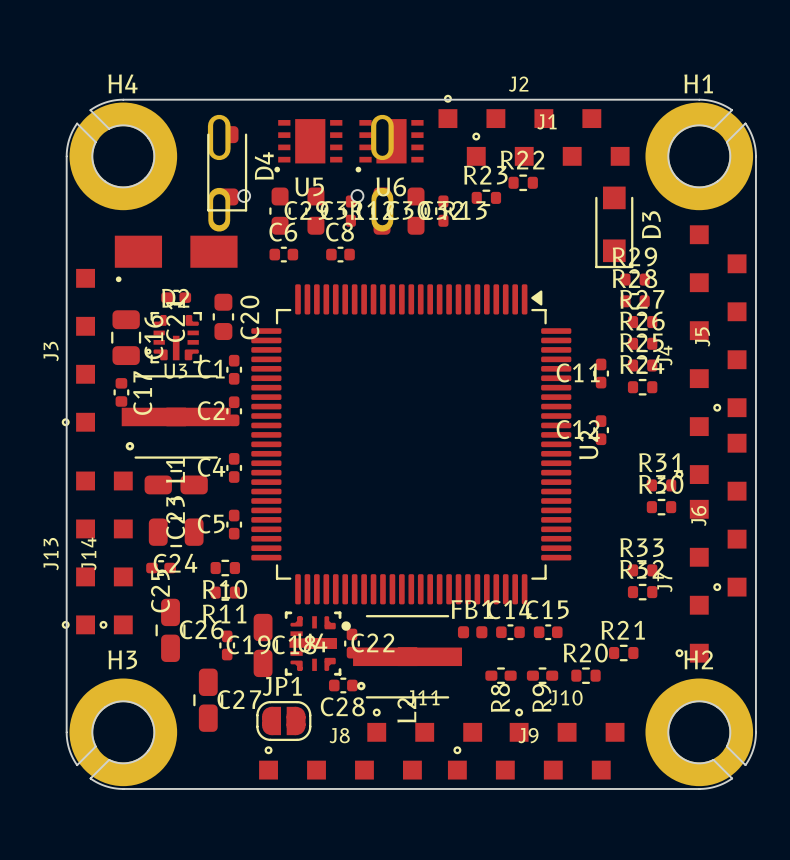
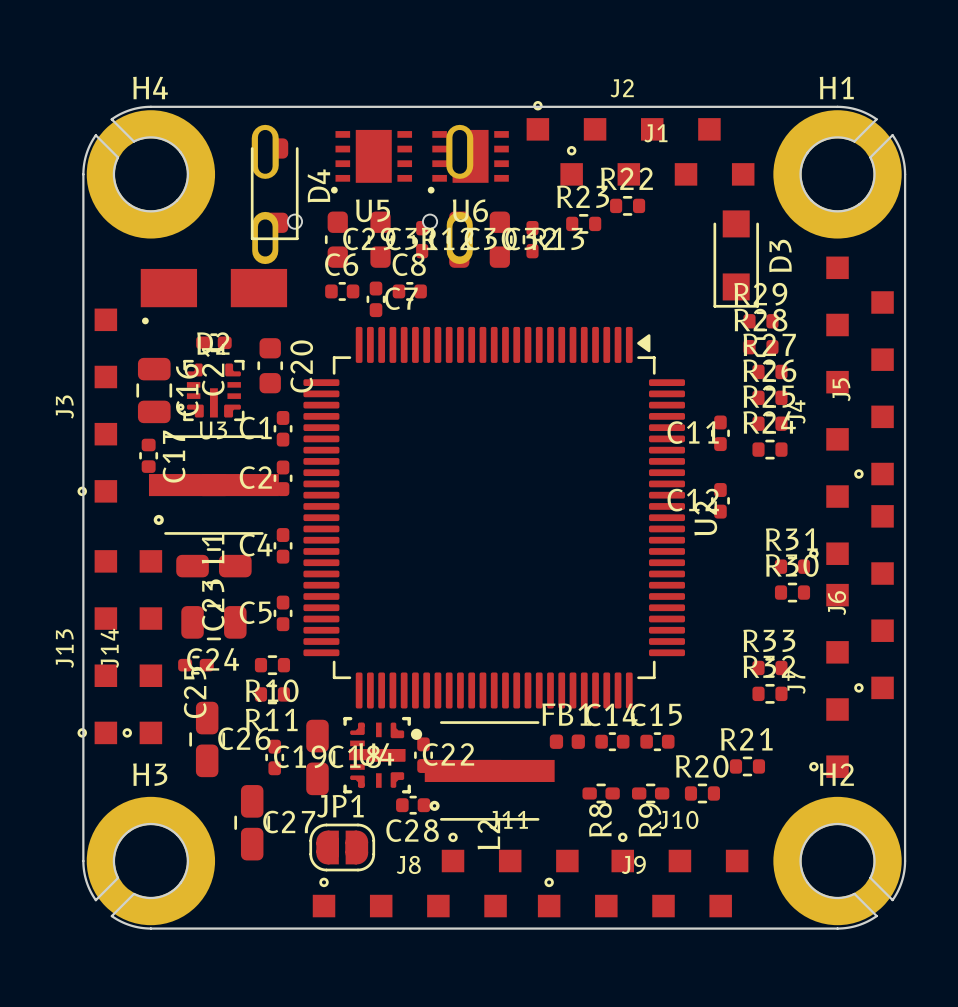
C7: none -> (376, 299)

